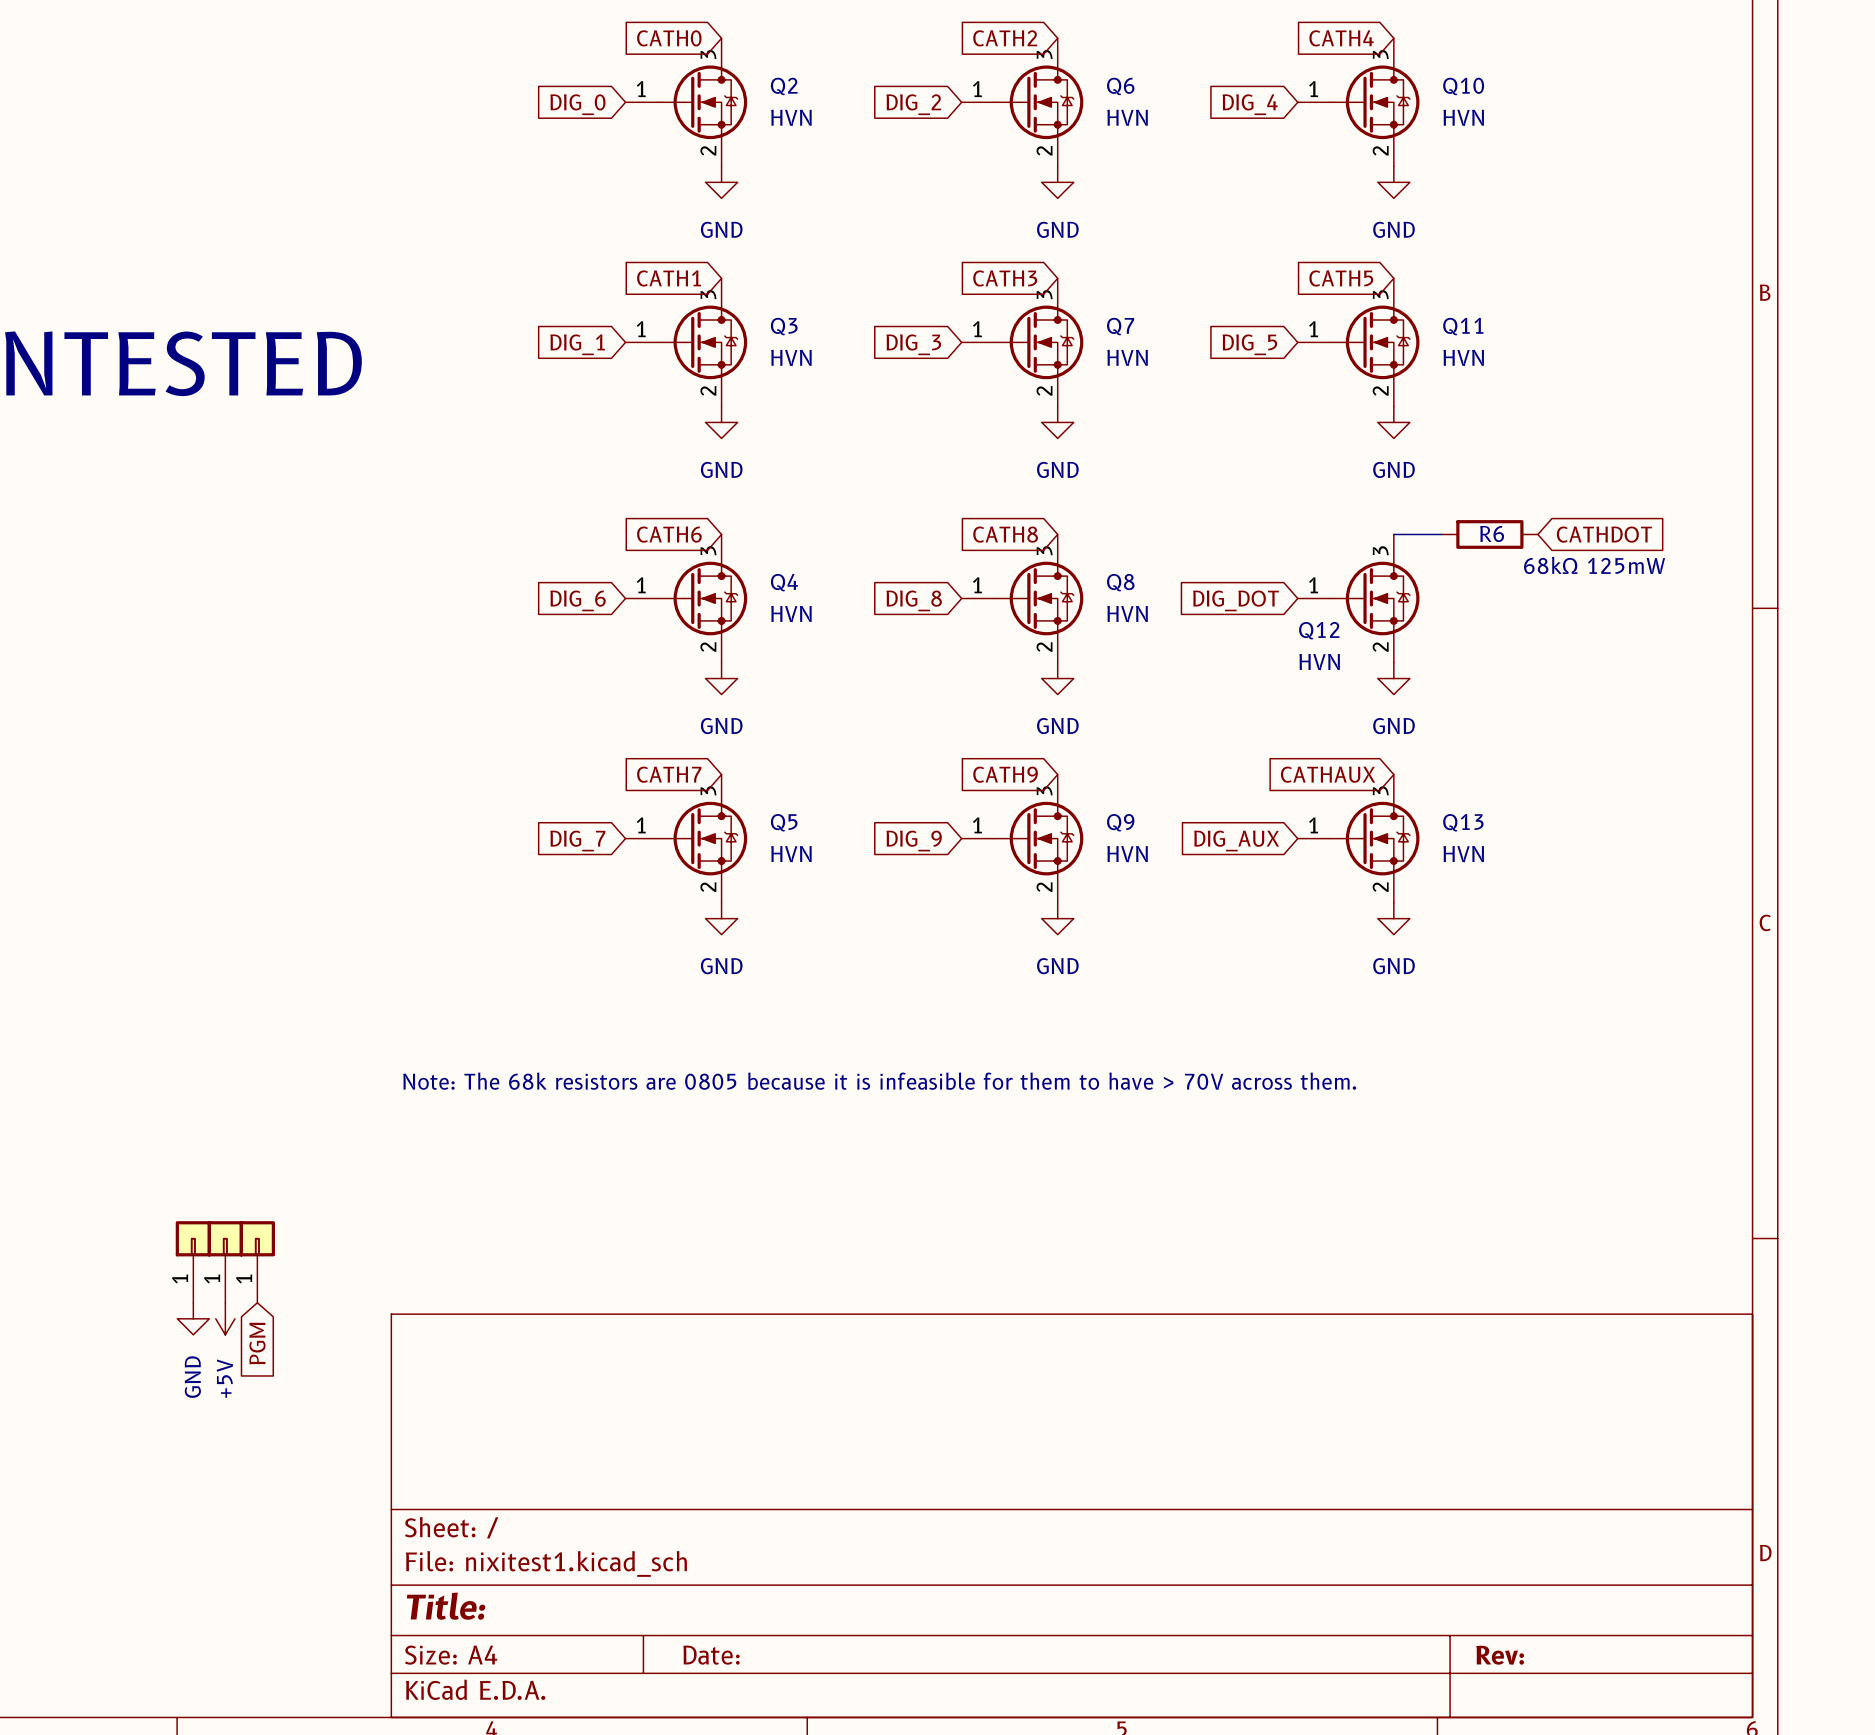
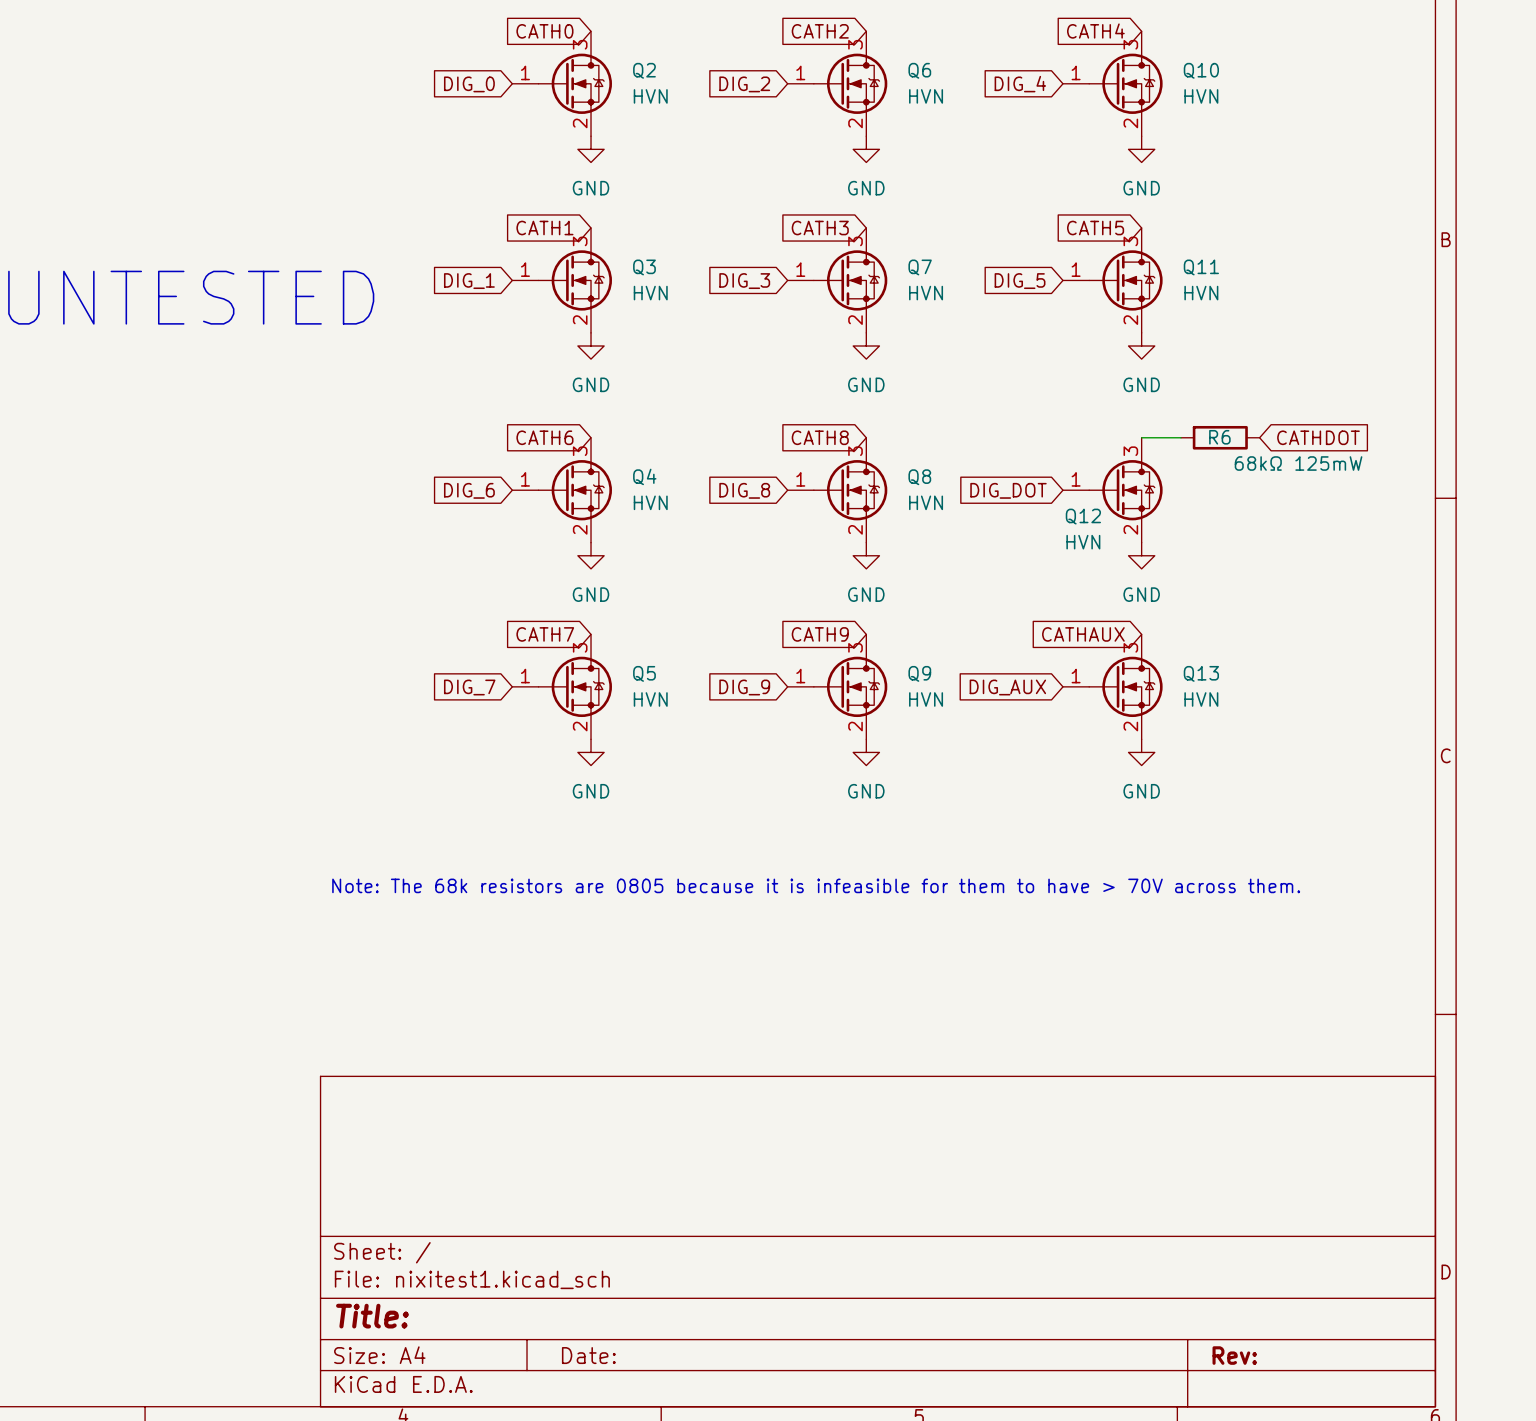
part: (193, 1261) -> none
part: (225, 1261) -> none
part: (257, 1261) -> none
power symbol: GND (193, 1318) -> none
power symbol: +5V (225, 1318) -> none
global label: PGM (257, 1343) -> none

